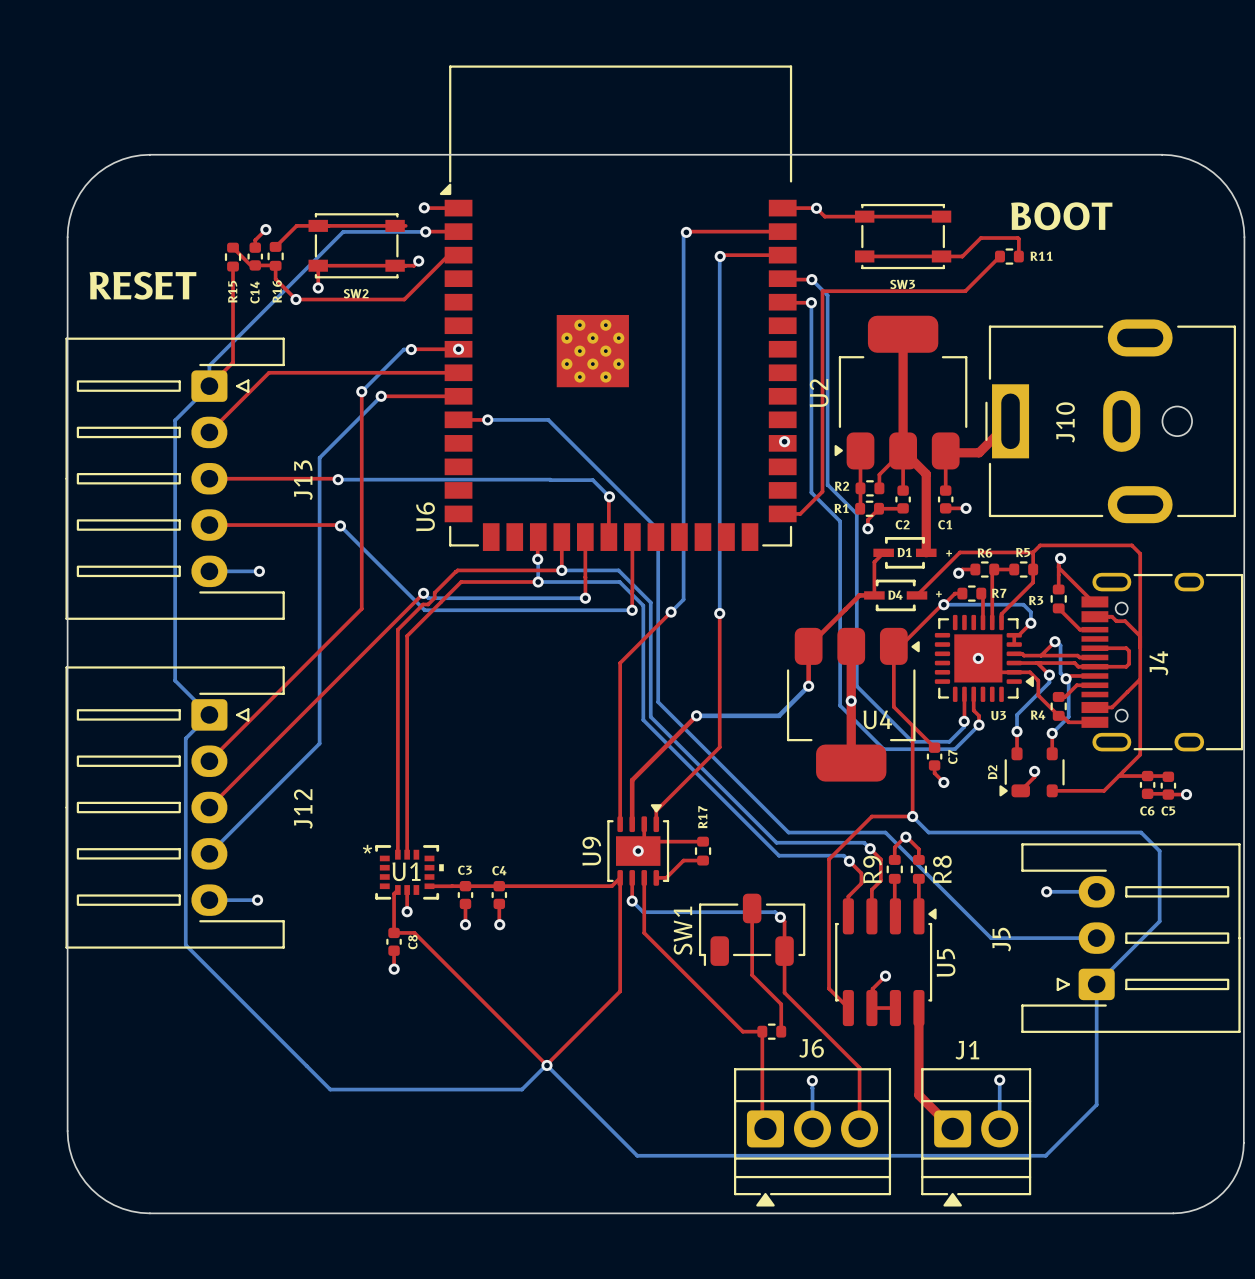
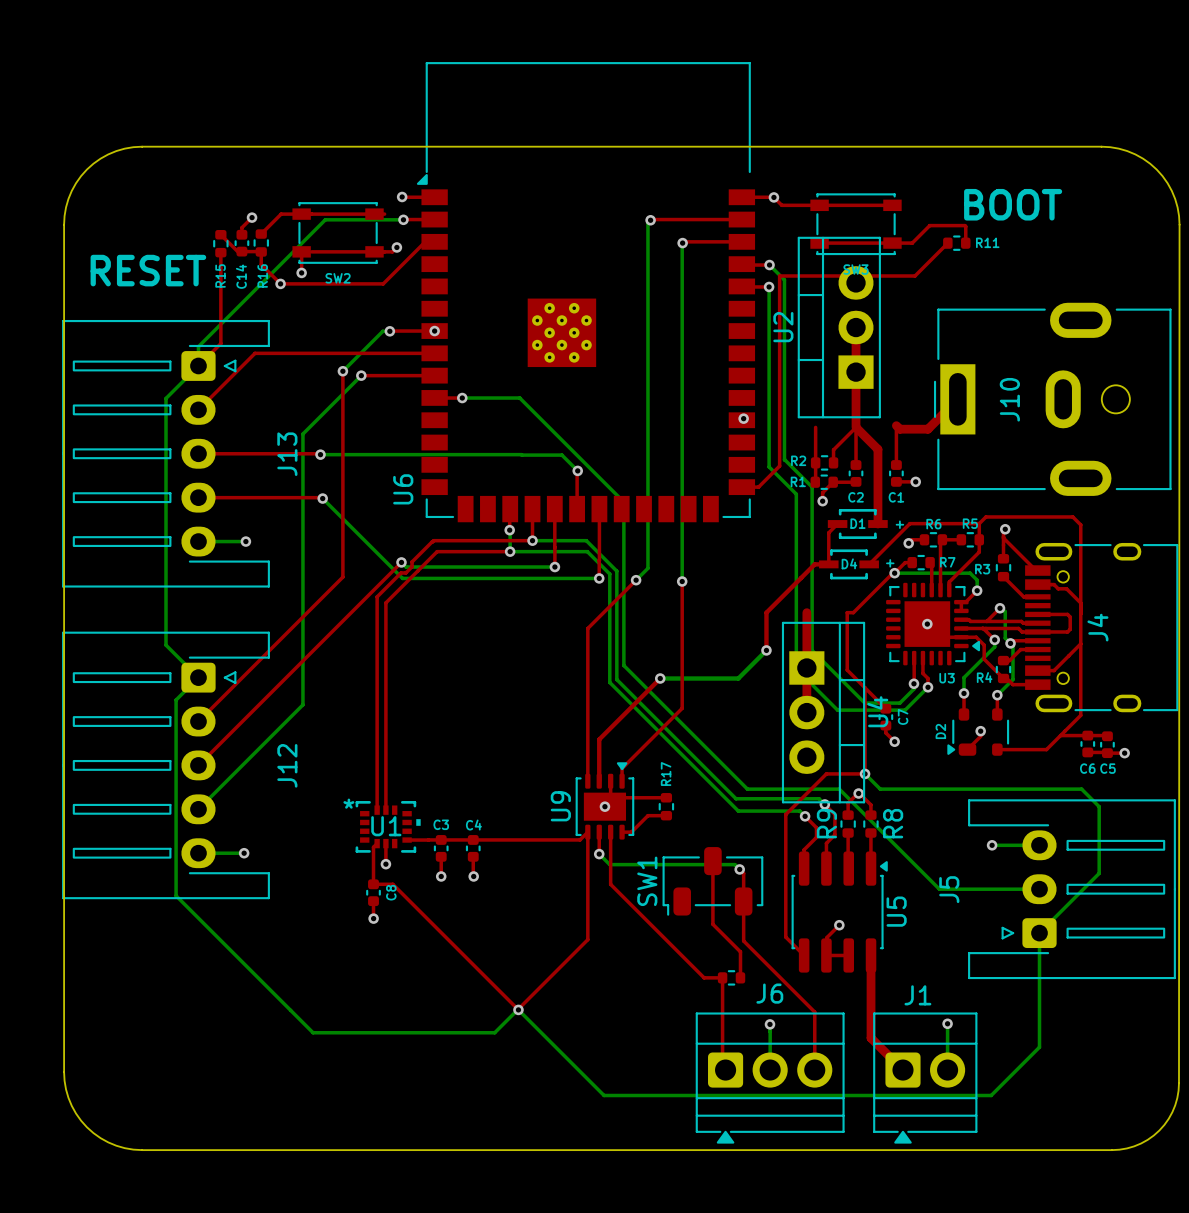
U2 footprint: [834, 315, 968, 470] -> [797, 236, 881, 419]
U4 footprint: [786, 627, 920, 782] -> [781, 621, 866, 804]
U4 name position: U4 (877, 719) -> U4 (877, 711)

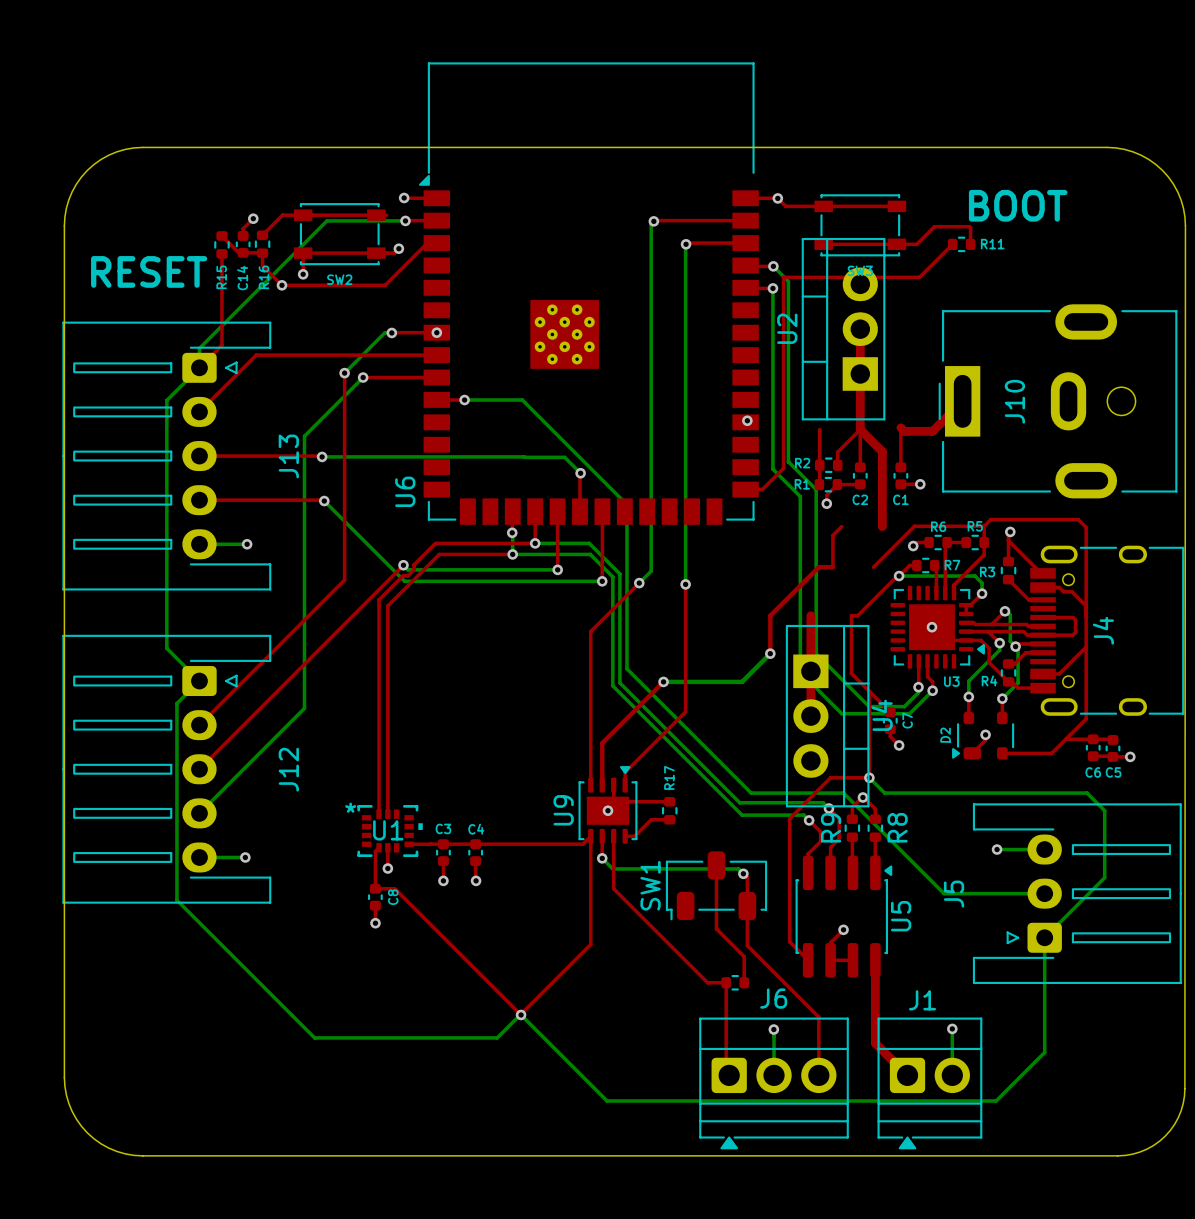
D1: (857, 524) -> none
D4: (848, 564) -> none

